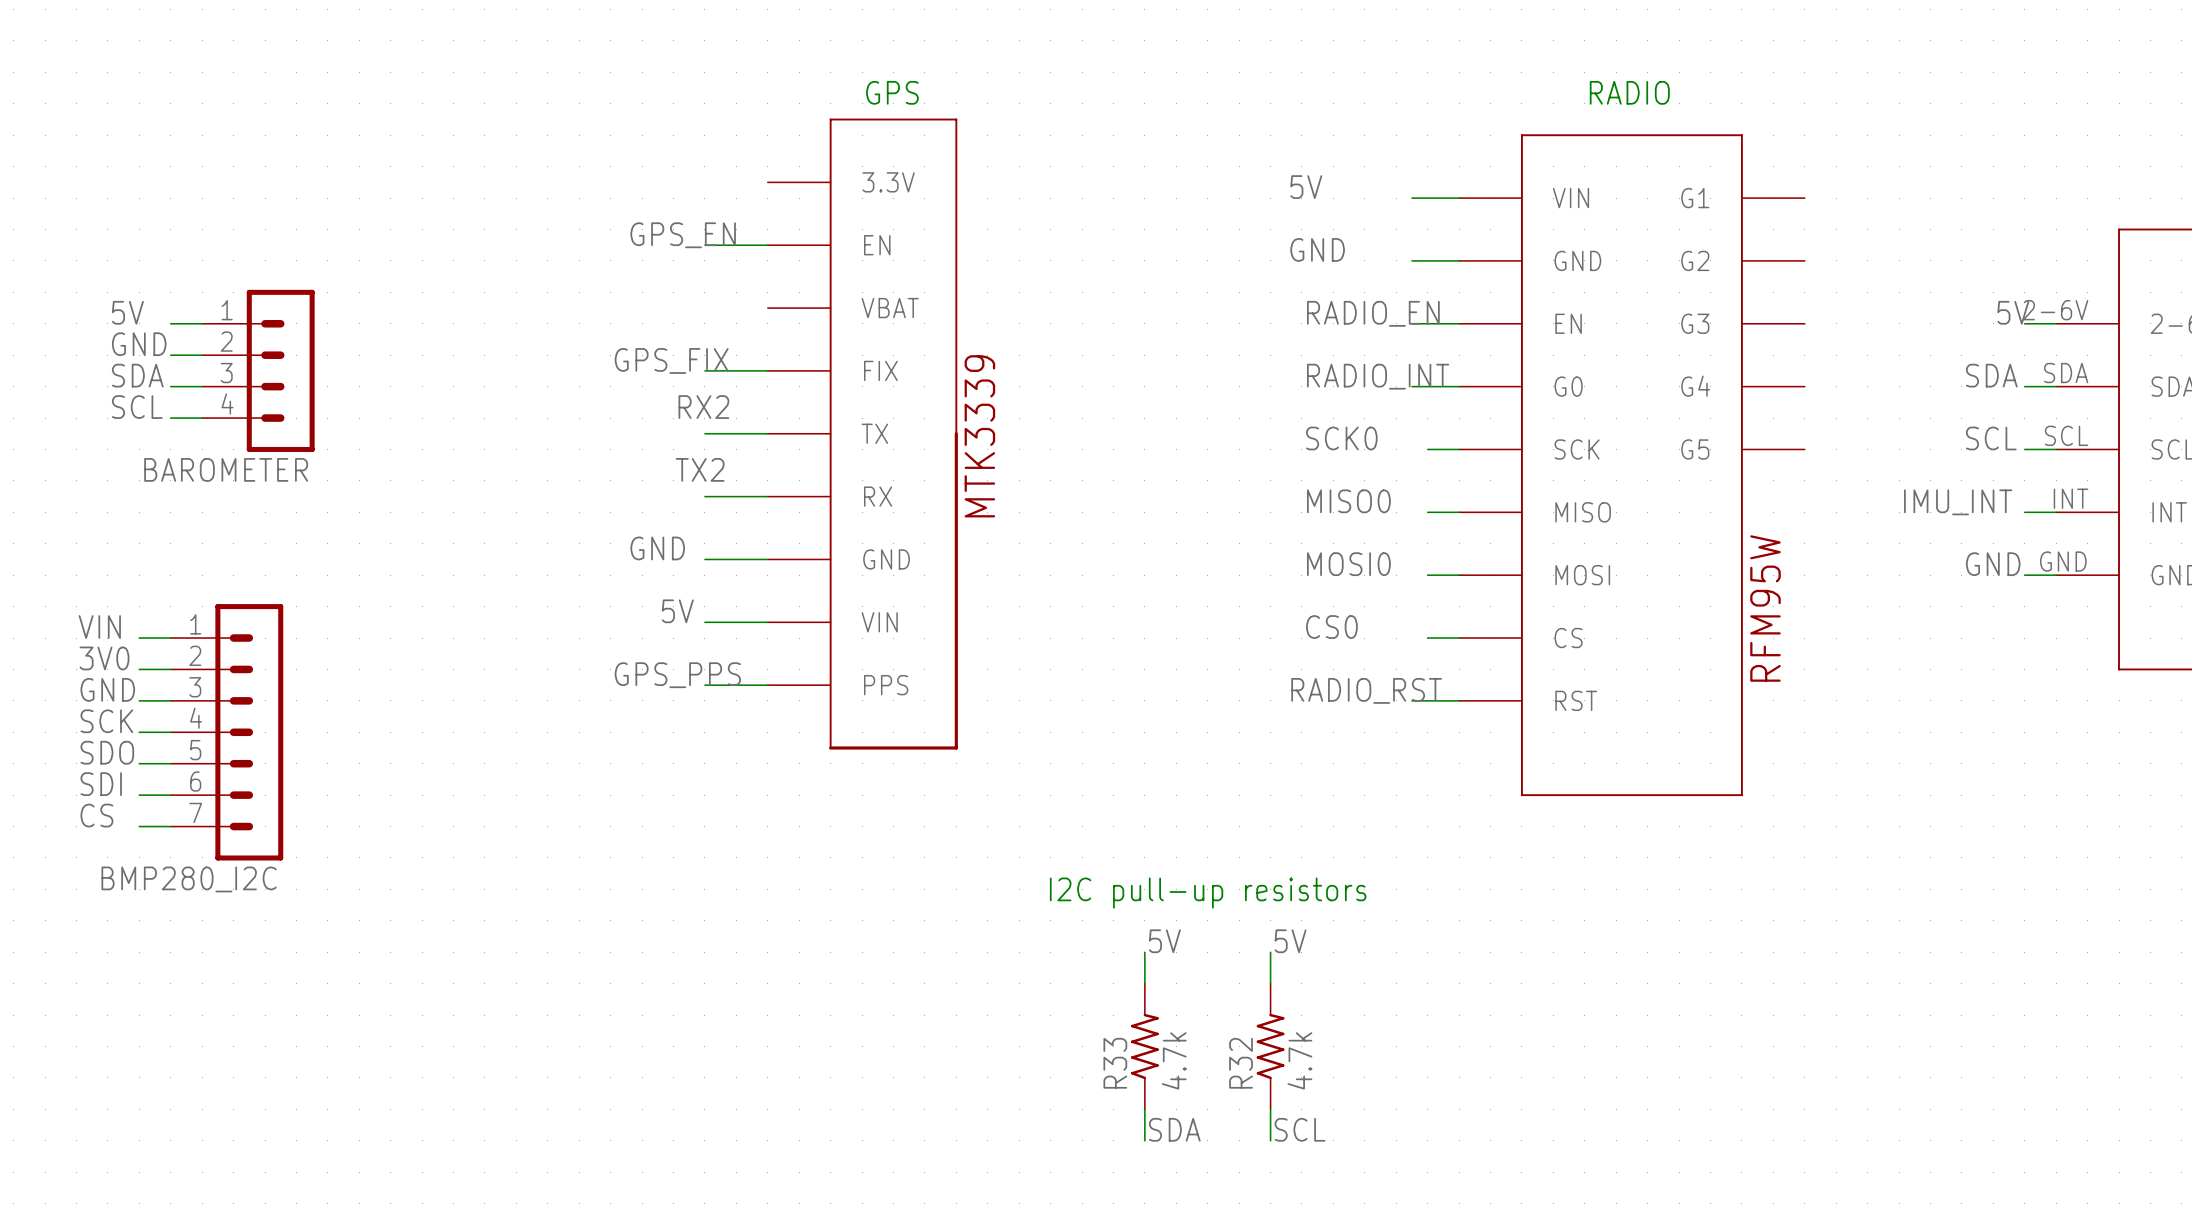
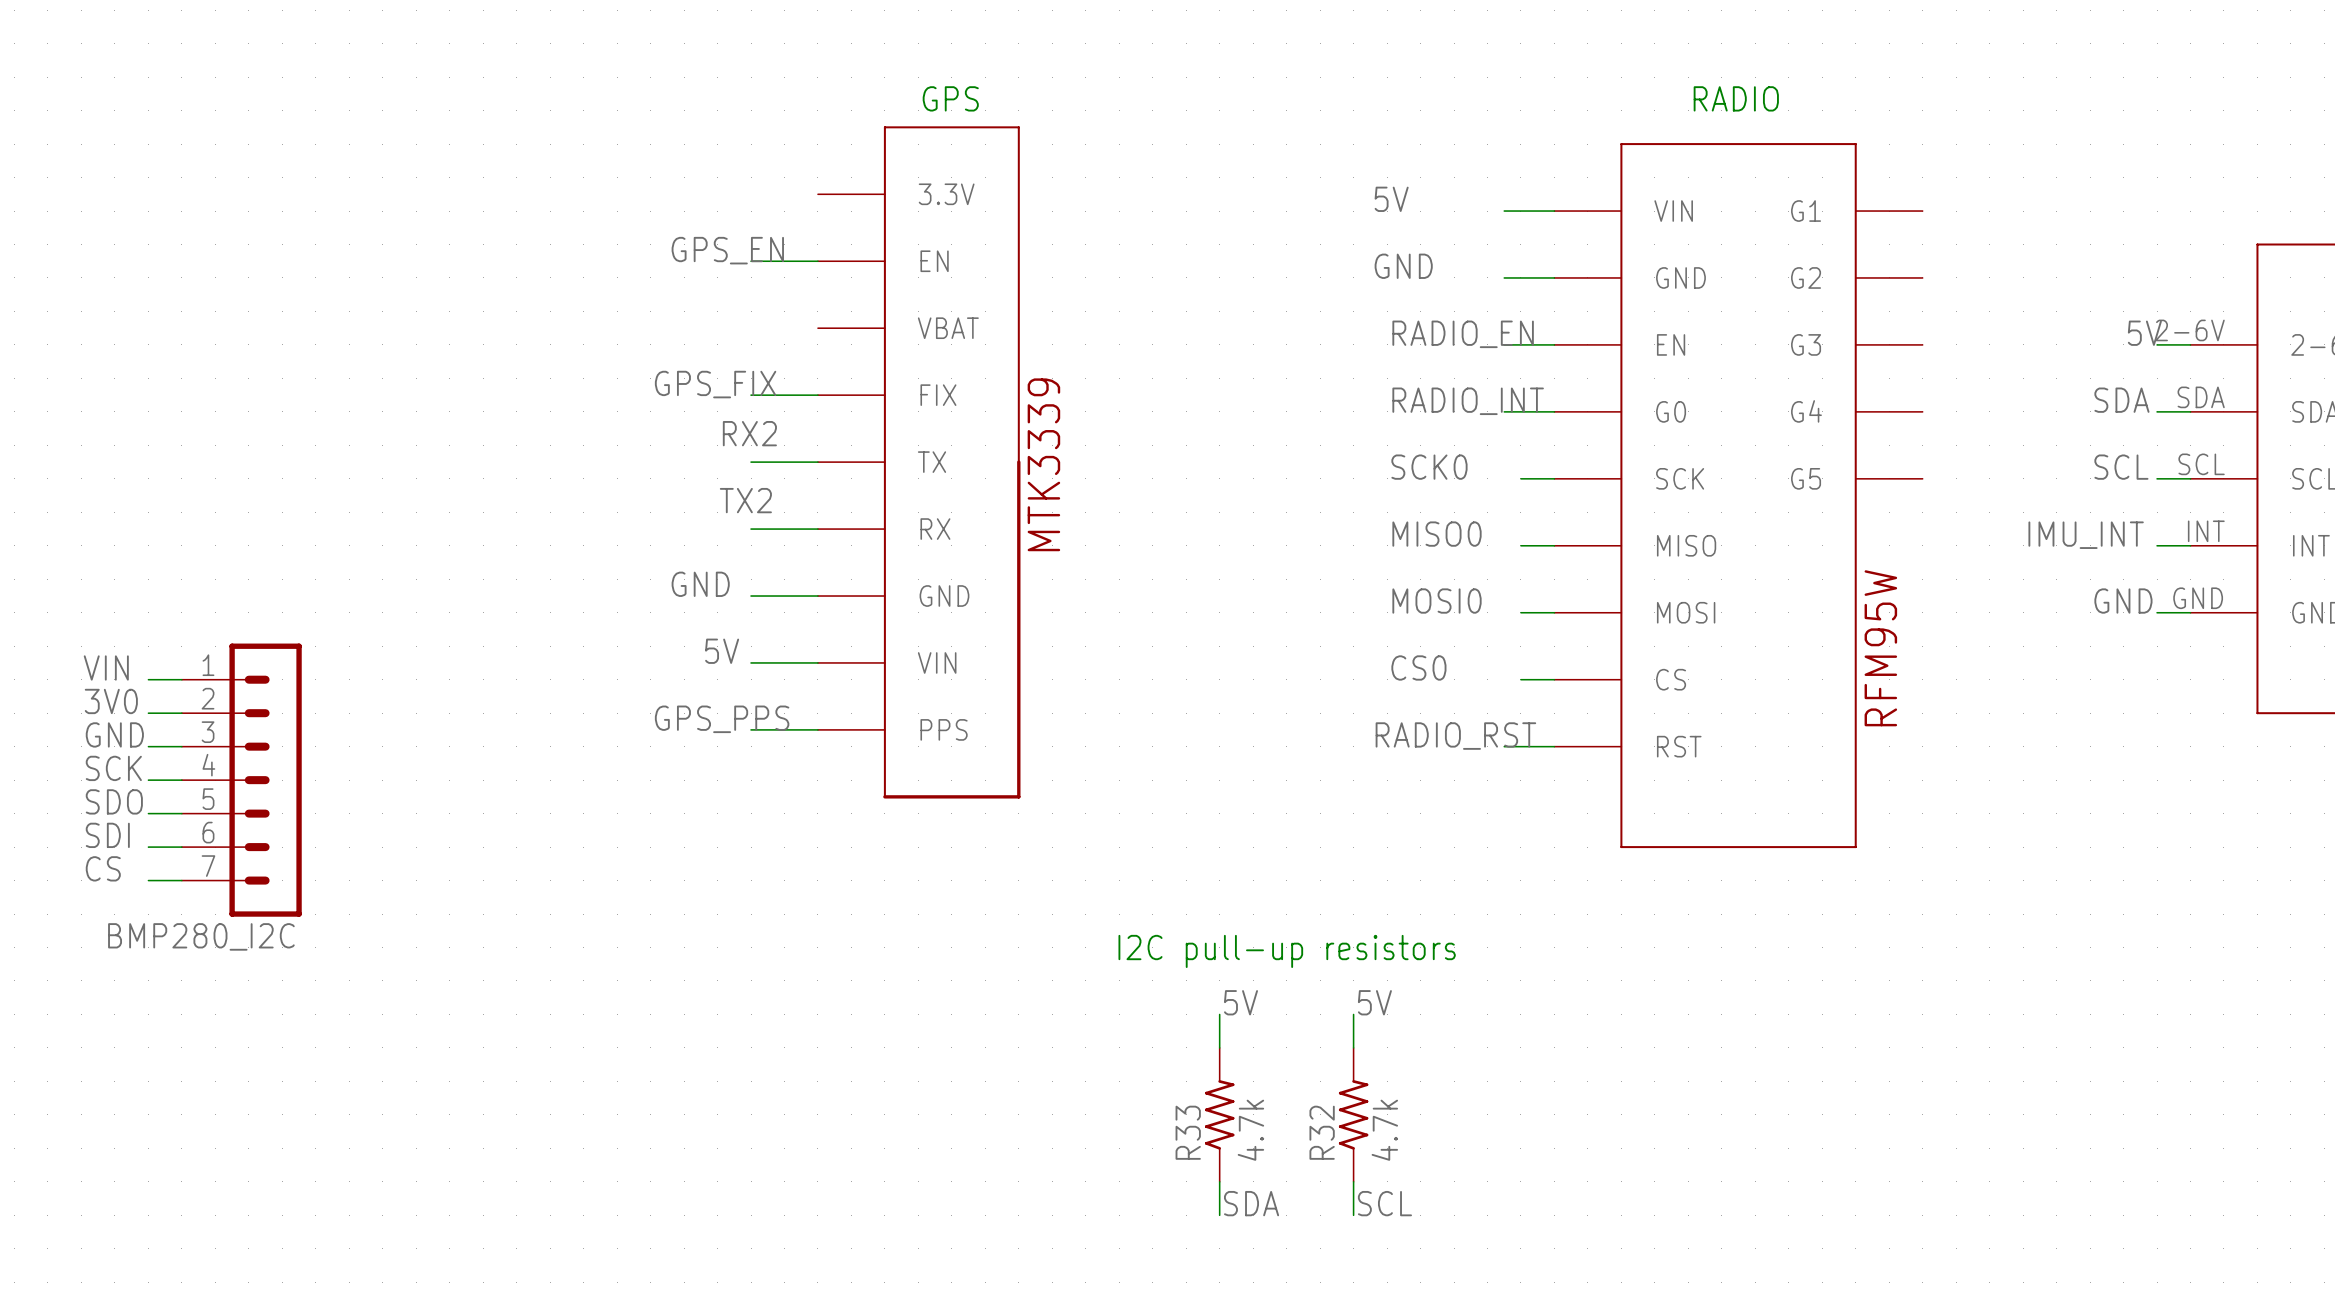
label: 5V (127, 312) -> none
wire: (170, 323) (202, 323) -> none
label: GND (139, 344) -> none
wire: (170, 355) (202, 355) -> none
BAROMETER: (258, 370) -> none
label: SDA (137, 375) -> none
wire: (170, 386) (202, 386) -> none
label: SCL (137, 407) -> none
wire: (170, 418) (202, 418) -> none

